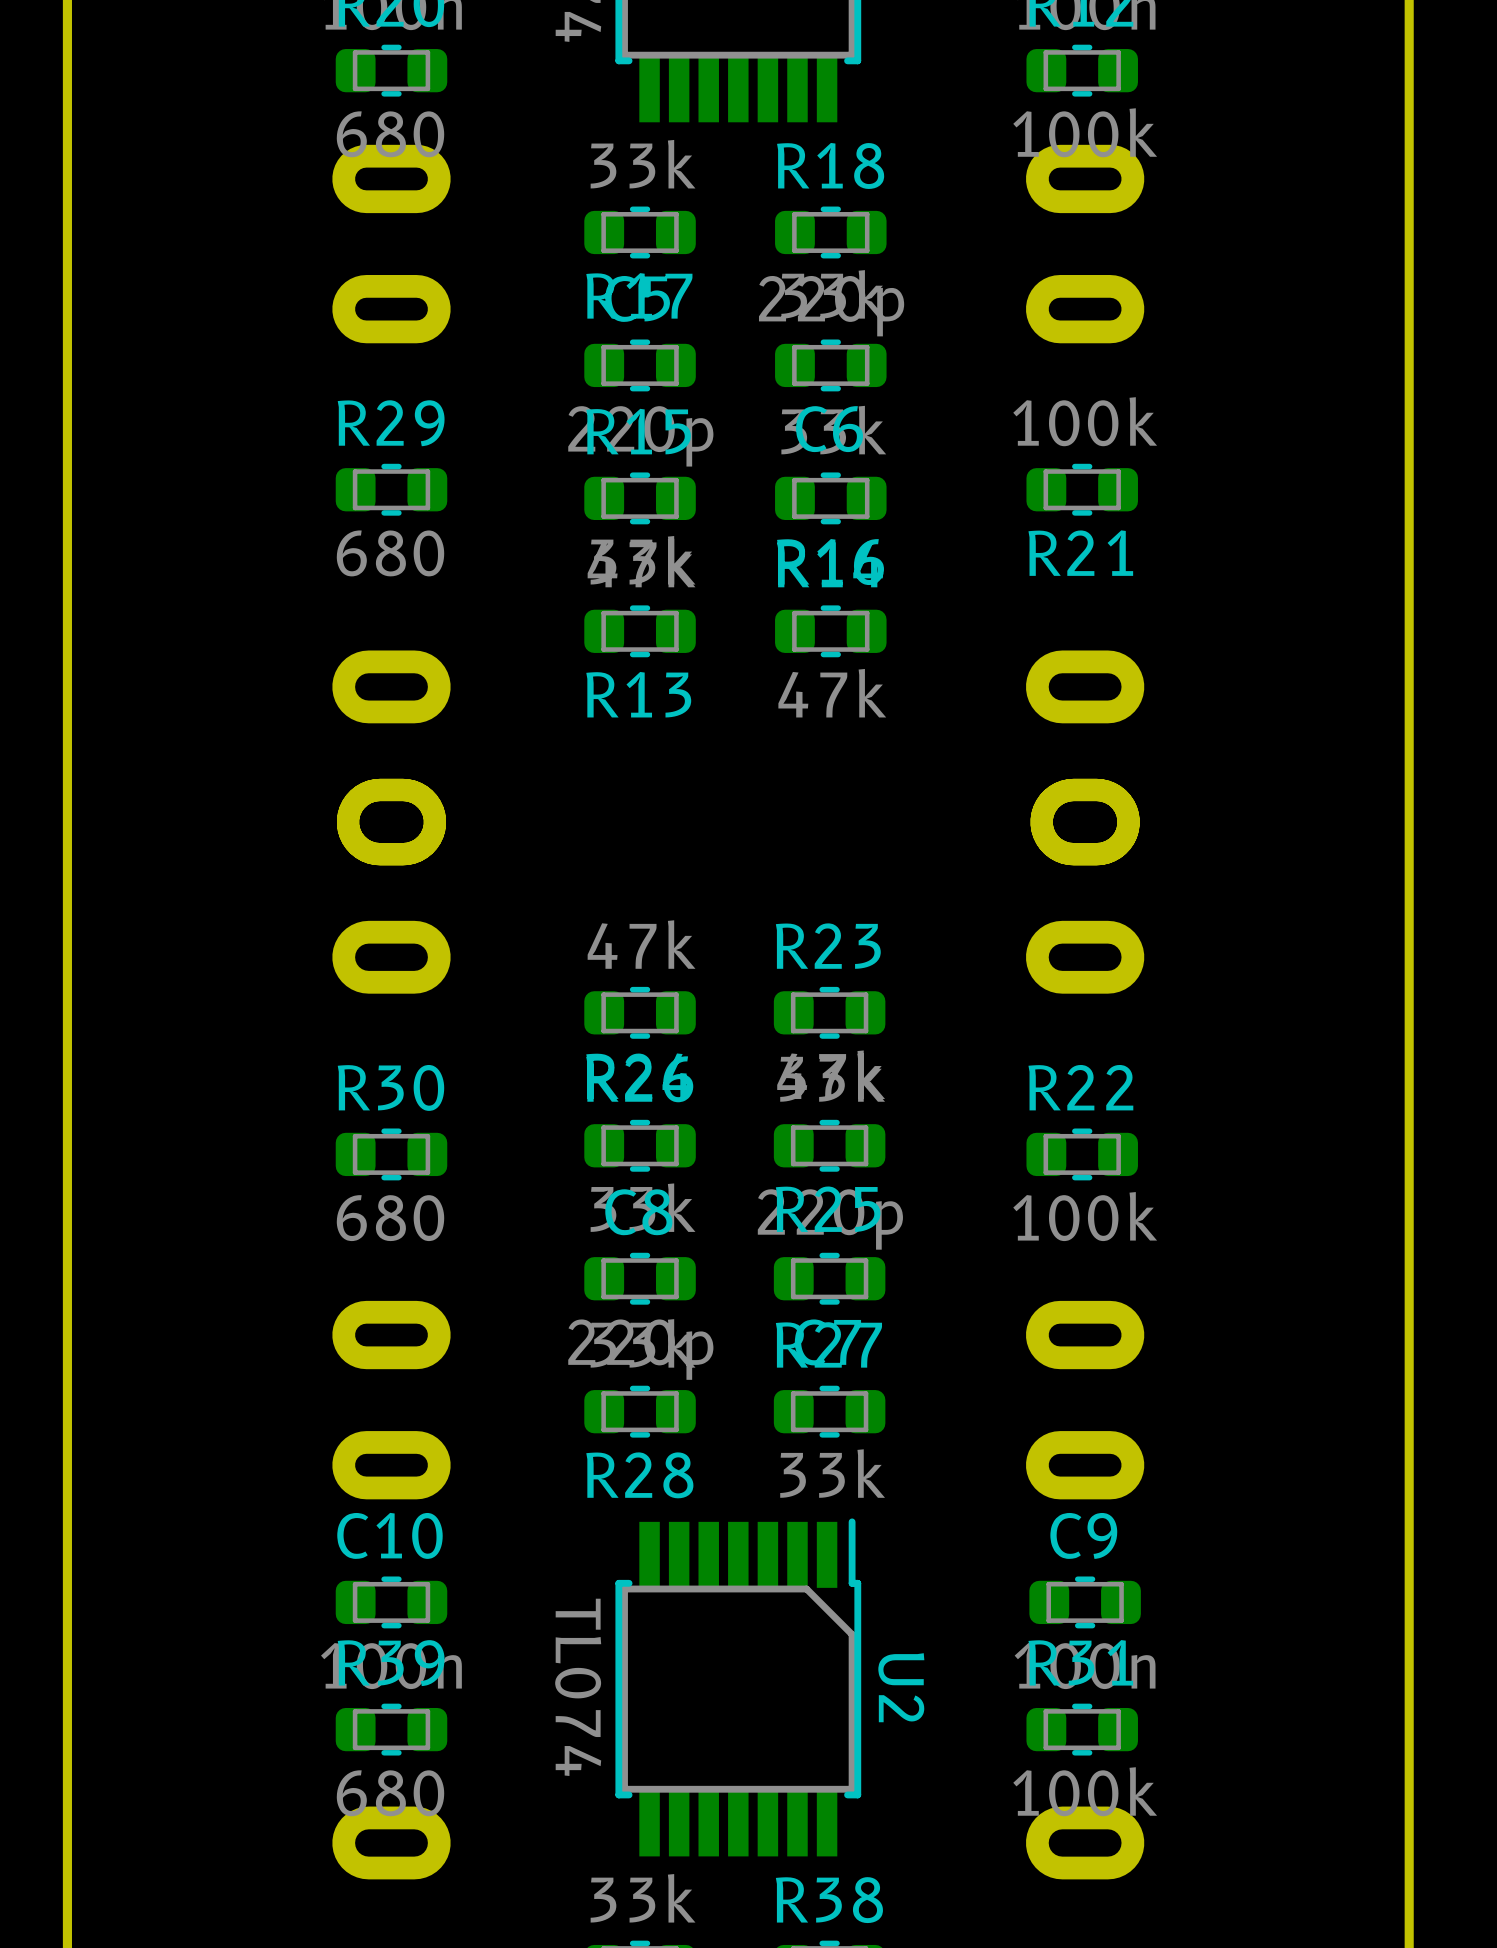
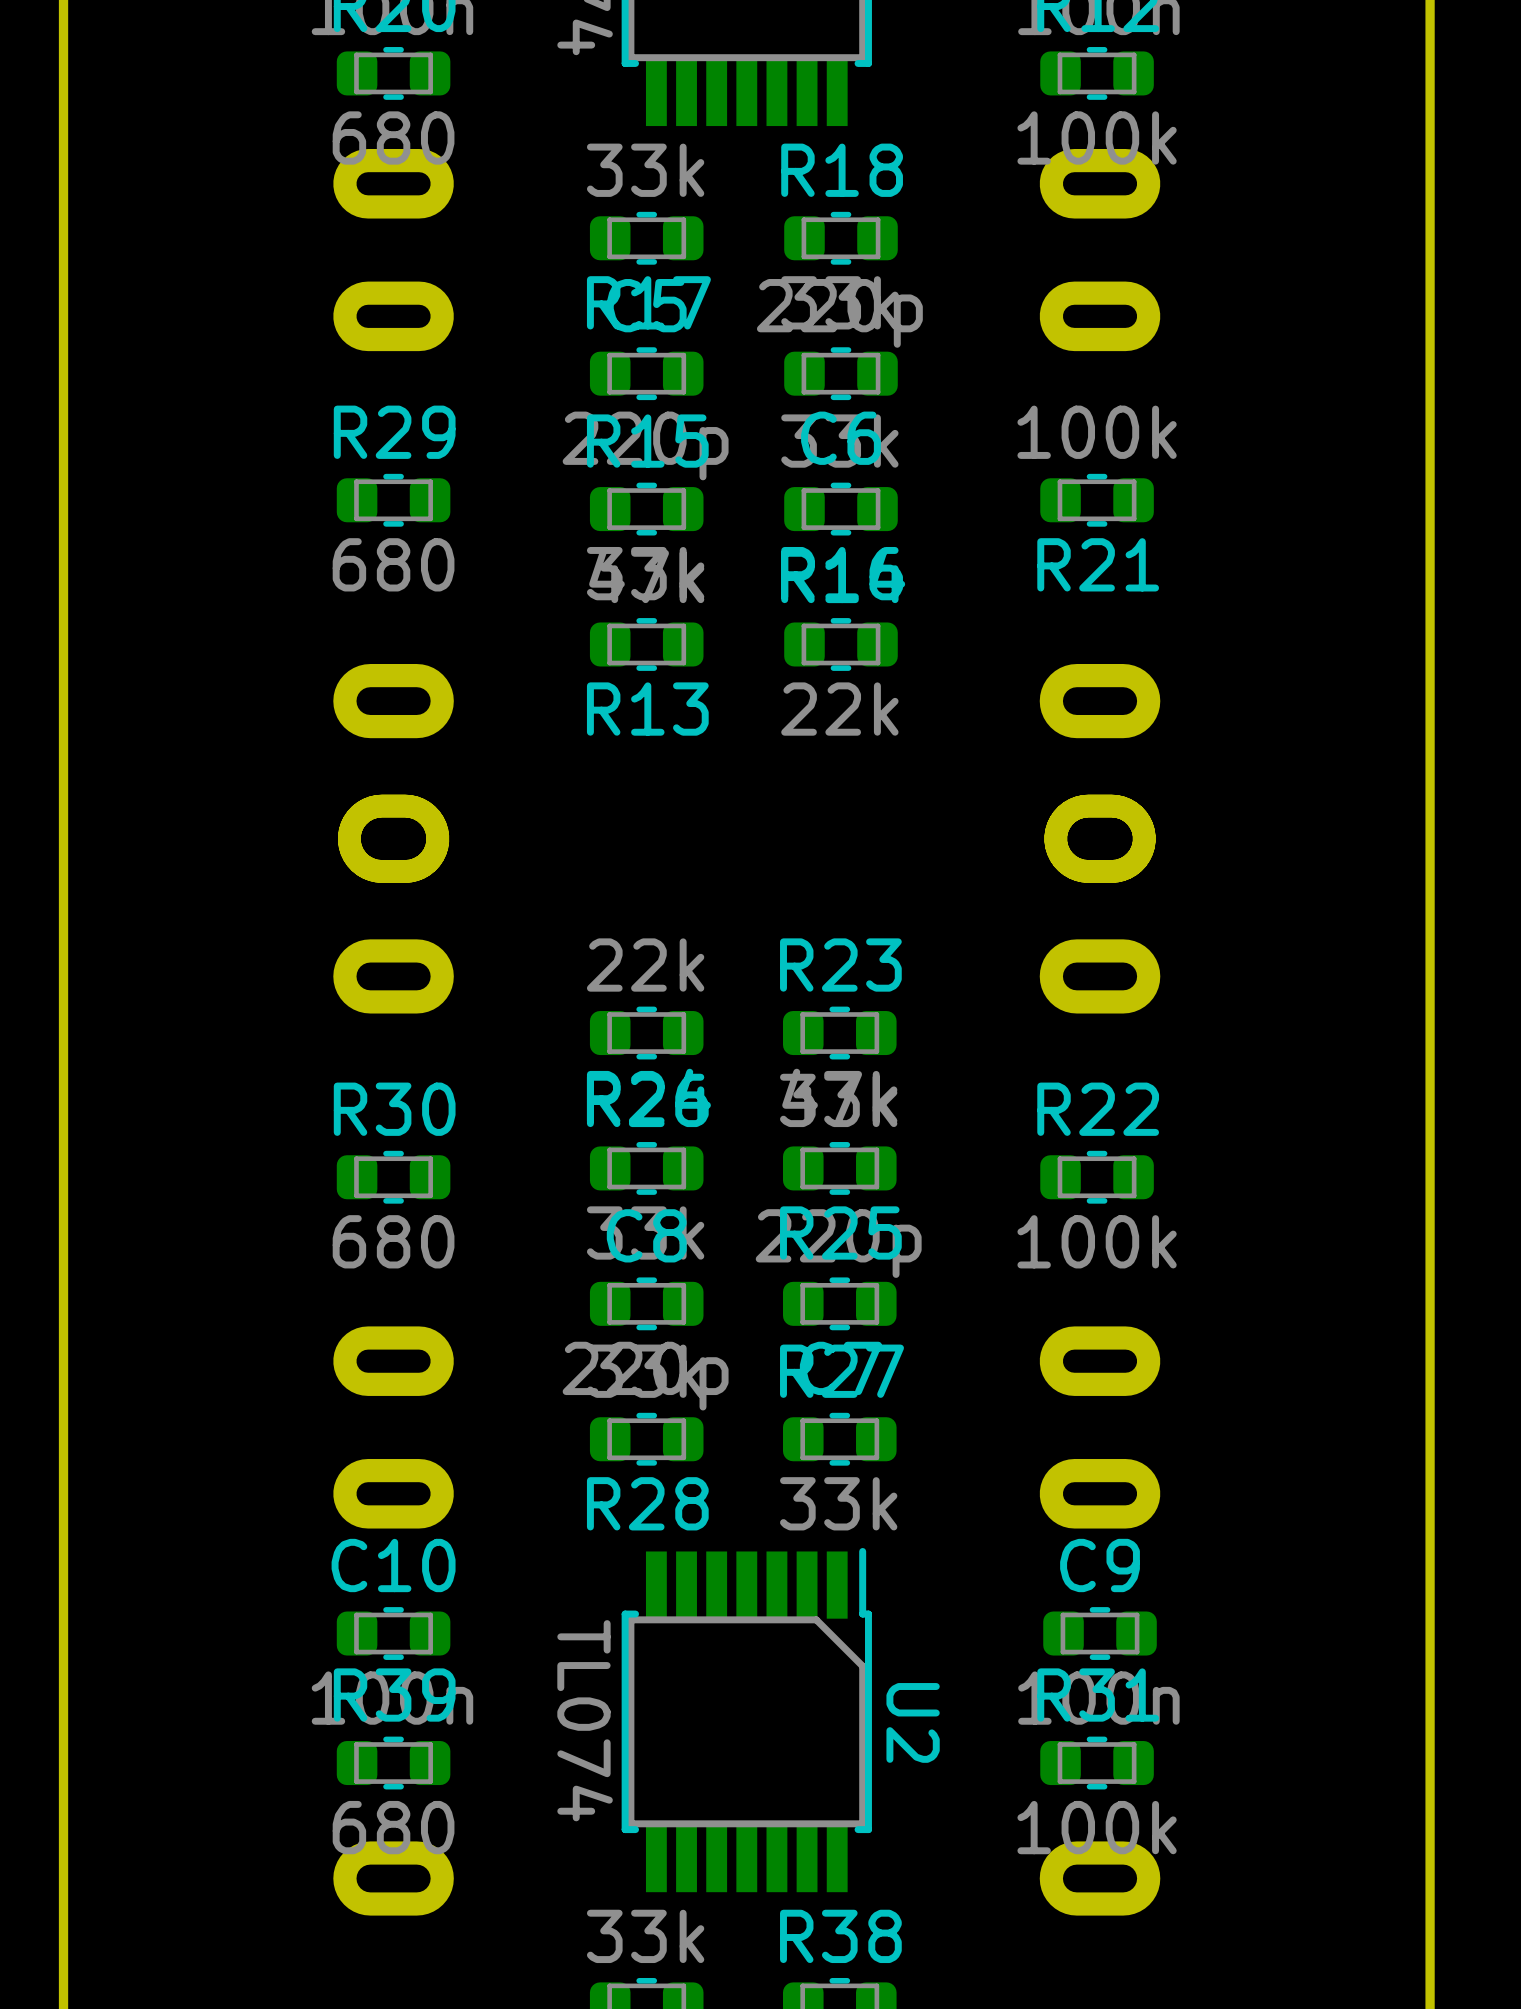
part value: 47k (832, 693) -> 22k (839, 709)
part value: 47k (641, 944) -> 22k (645, 965)

